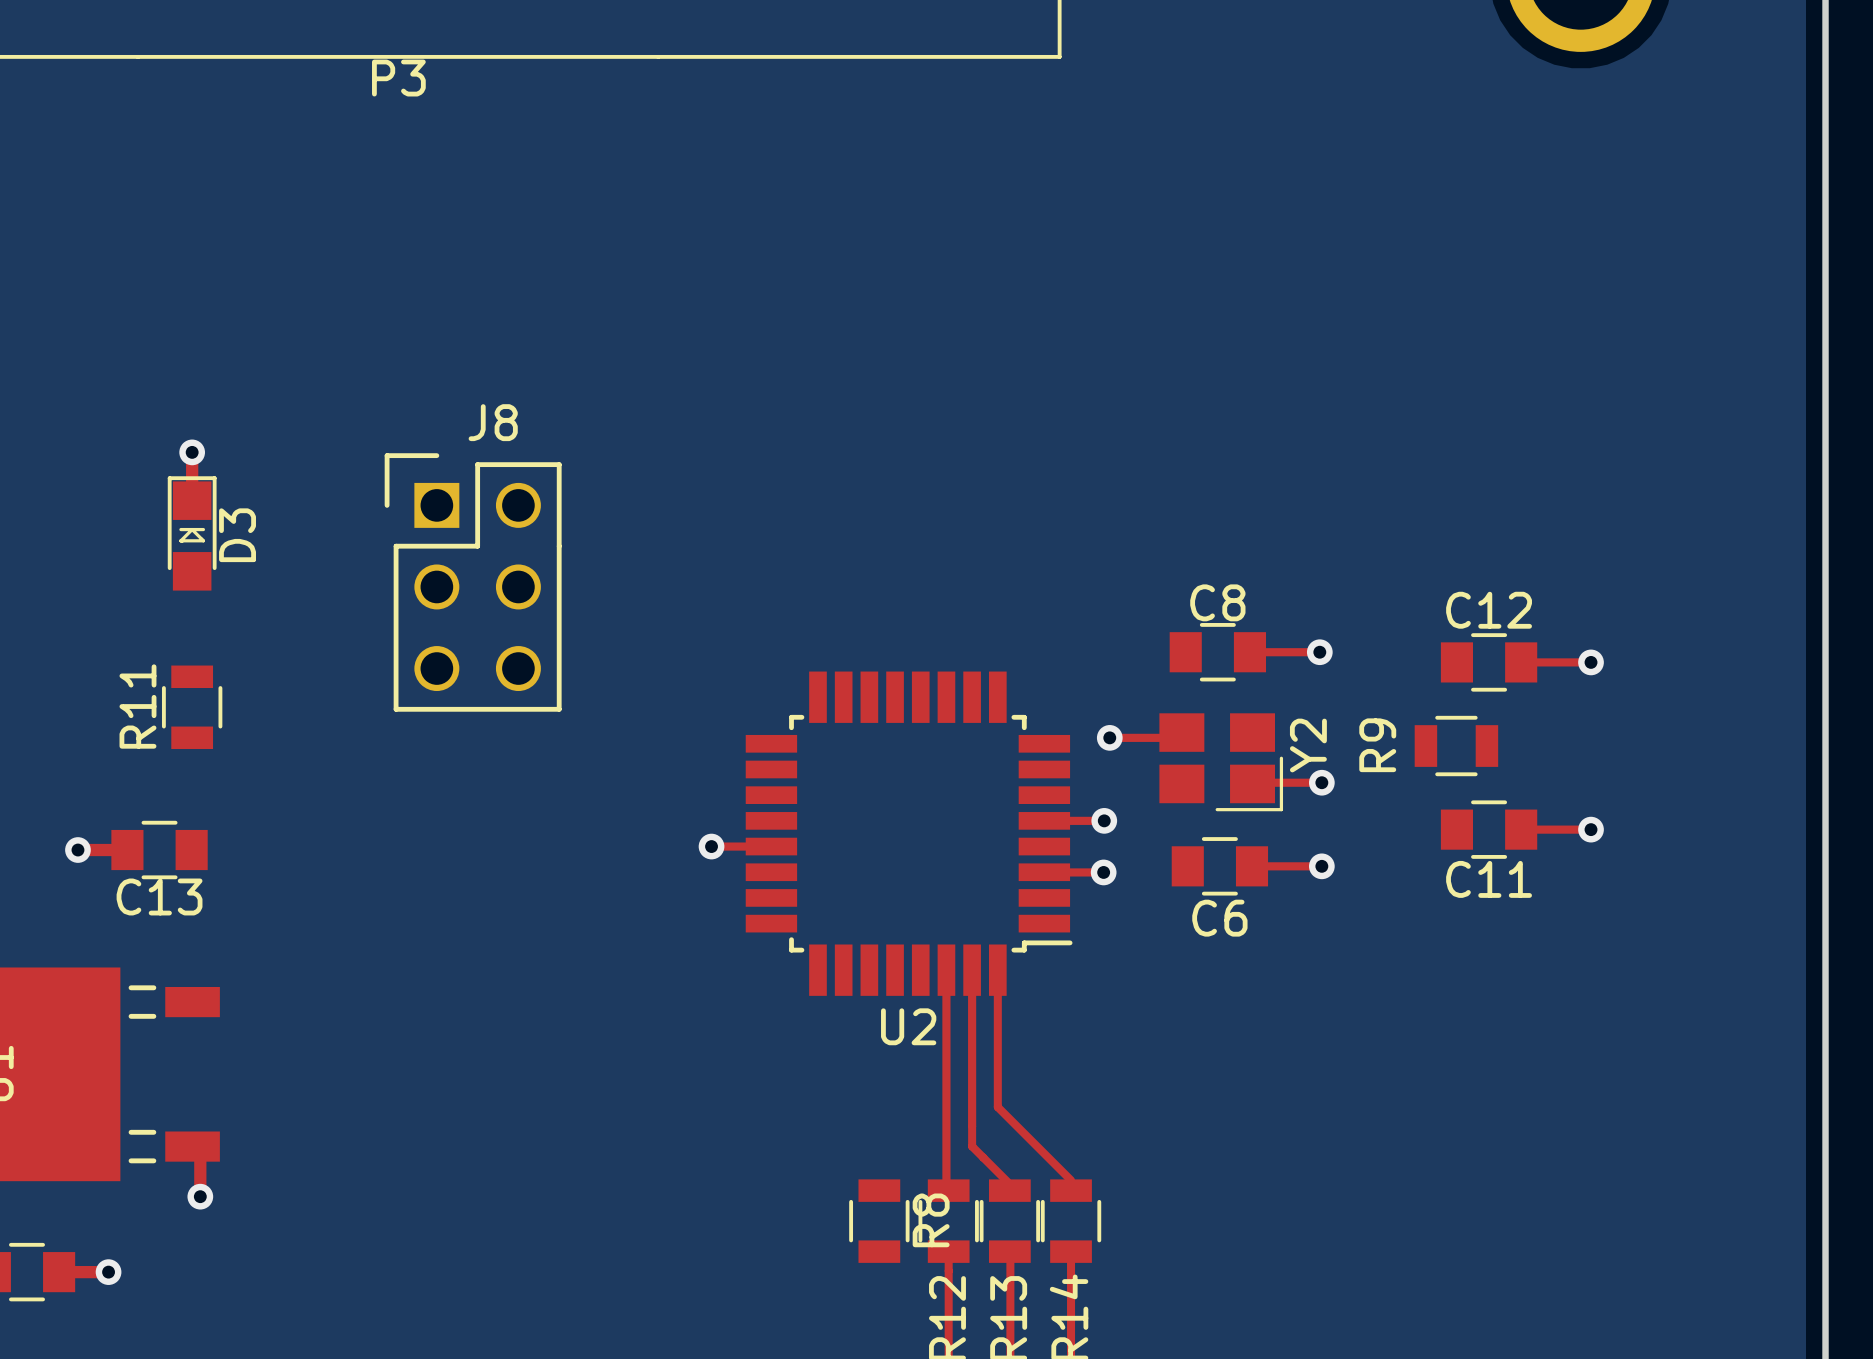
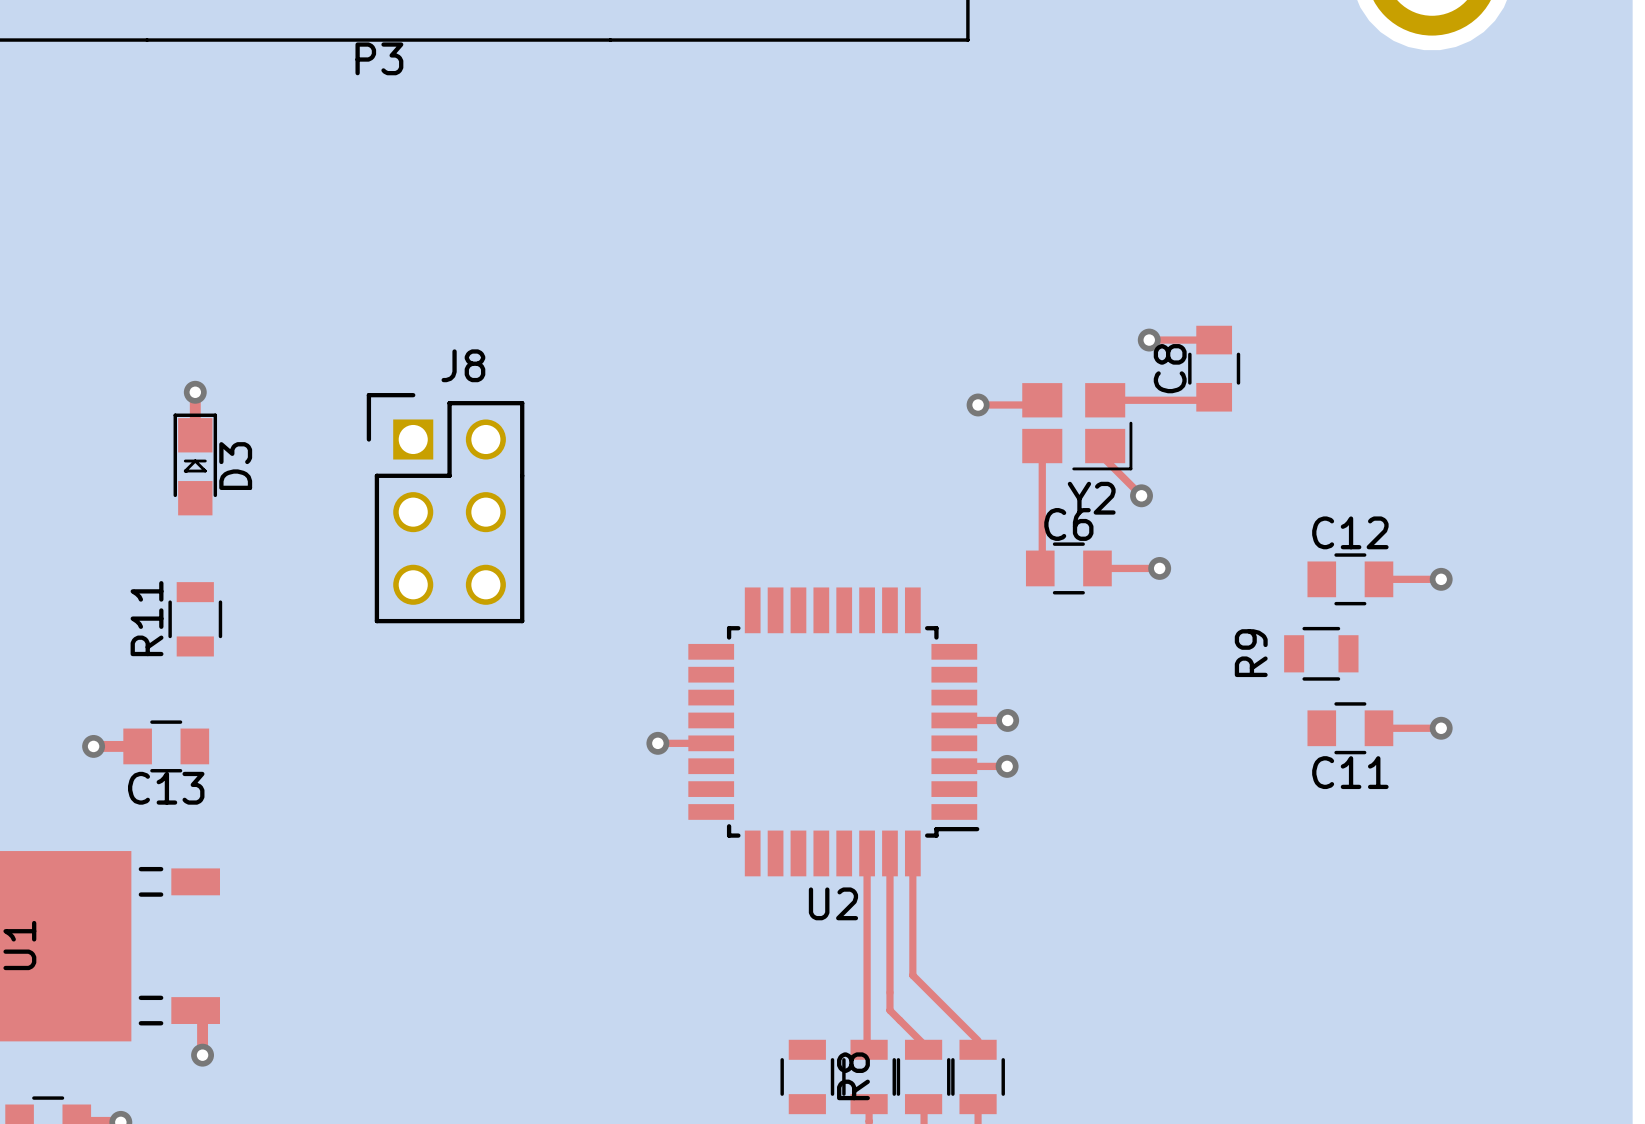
top track: none -> (1149, 340) (1214, 340)
via: none -> (1149, 340)
top track: none -> (1210, 397) (1214, 397) (1211, 400) (1102, 400)
via: none -> (978, 404)
top track: none -> (1042, 446) (1042, 566) (1040, 572)
top track: none -> (1097, 450) (1102, 446) (1105, 446) (1105, 459) (1141, 495)
via: none -> (1141, 495)
C8 name position: C8 (1217, 602) -> C8 (1170, 368)
C8 rotation: 0° (1217, 652) -> 90° clockwise (1214, 368)
C8 position: (1217, 652) -> (1214, 368)
top track: (1249, 652) (1319, 652) -> (1097, 568) (1159, 568)
via position: (1319, 652) -> (1159, 568)
top track: (1181, 732) (1176, 737) (1109, 737) -> (1042, 400) (1037, 404) (978, 404)
via: (1109, 737) -> none
Y2 name rotation: 0° (1308, 745) -> 90° clockwise (1091, 498)
Y2 name position: Y2 (1308, 745) -> Y2 (1091, 498)
Y2 position: (1221, 762) -> (1077, 426)
top track: (1252, 782) (1321, 782) -> none
via: (1321, 782) -> none
C6 position: (1219, 866) -> (1068, 568)
top track: (1252, 866) (1321, 866) -> none
via: (1321, 866) -> none
C6 name position: C6 (1219, 918) -> C6 (1068, 524)

